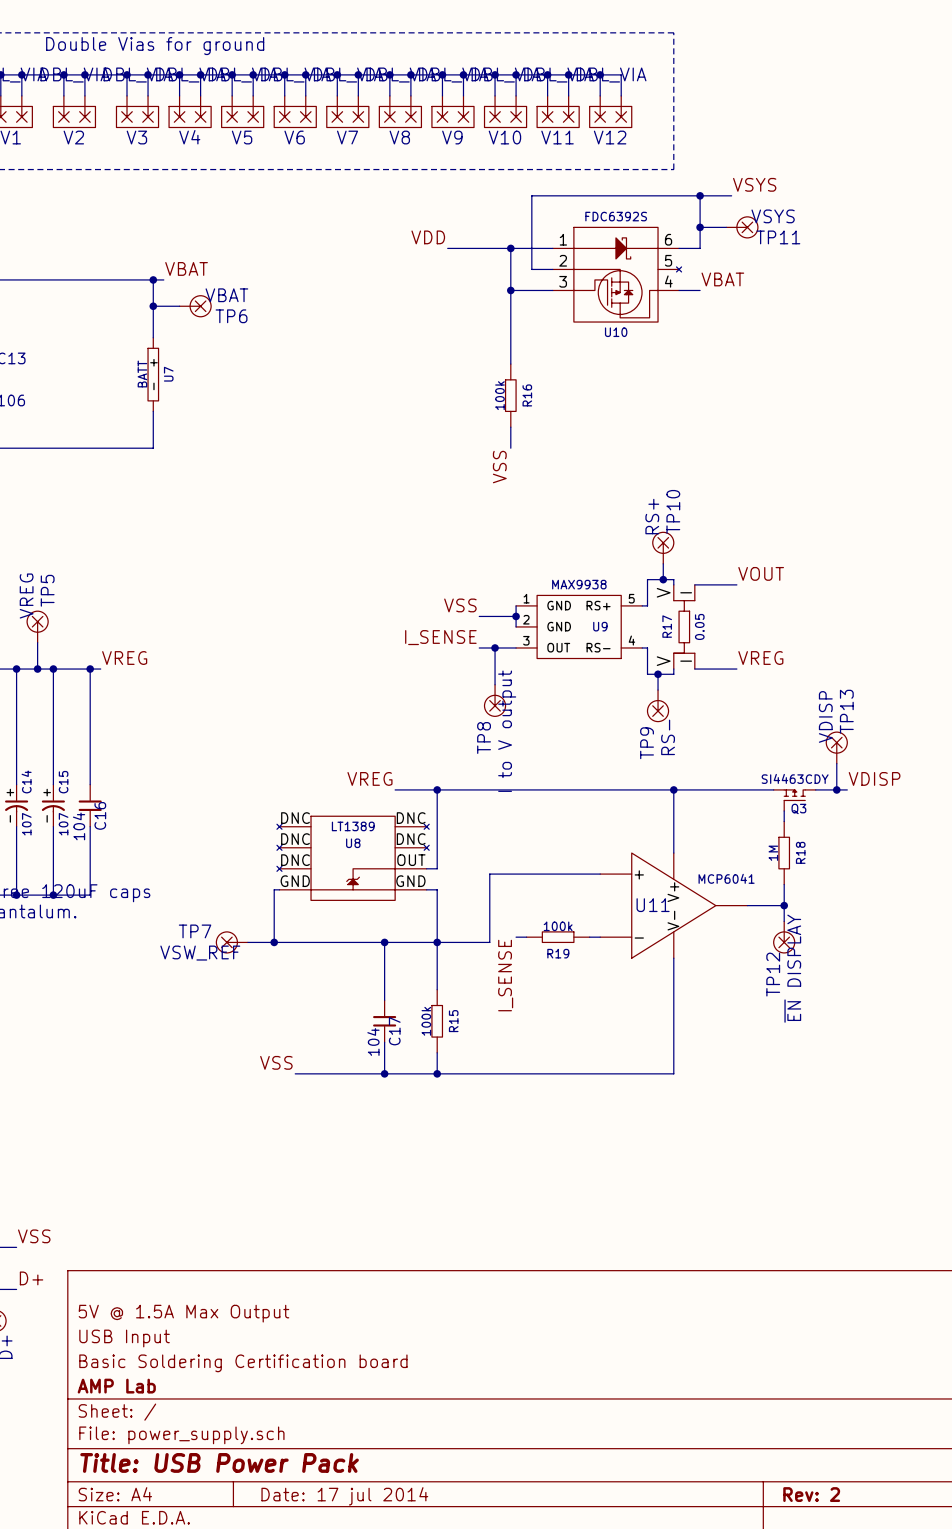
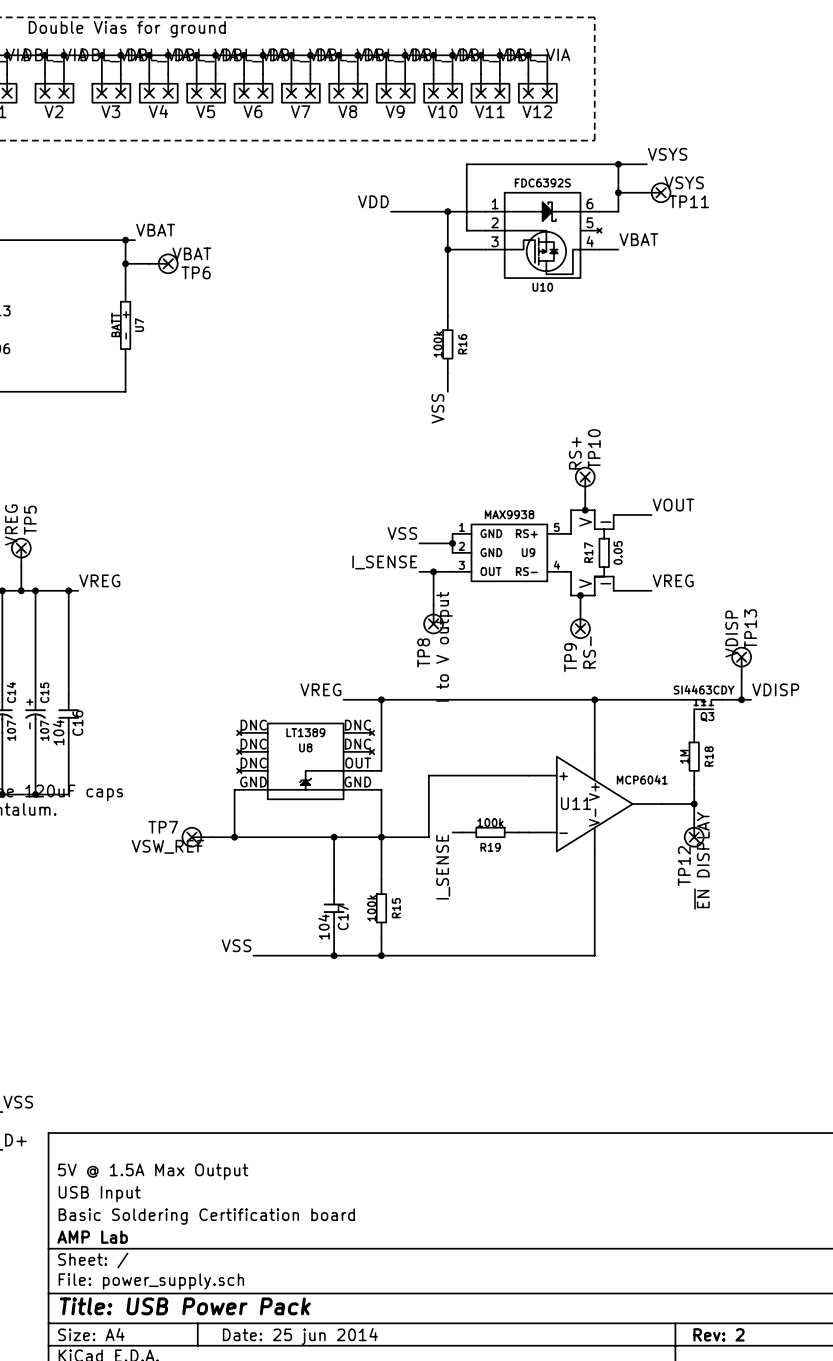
title block: Date: 17 jul 2014 (344, 1496) -> Date: 25 jun 2014 (300, 1336)

